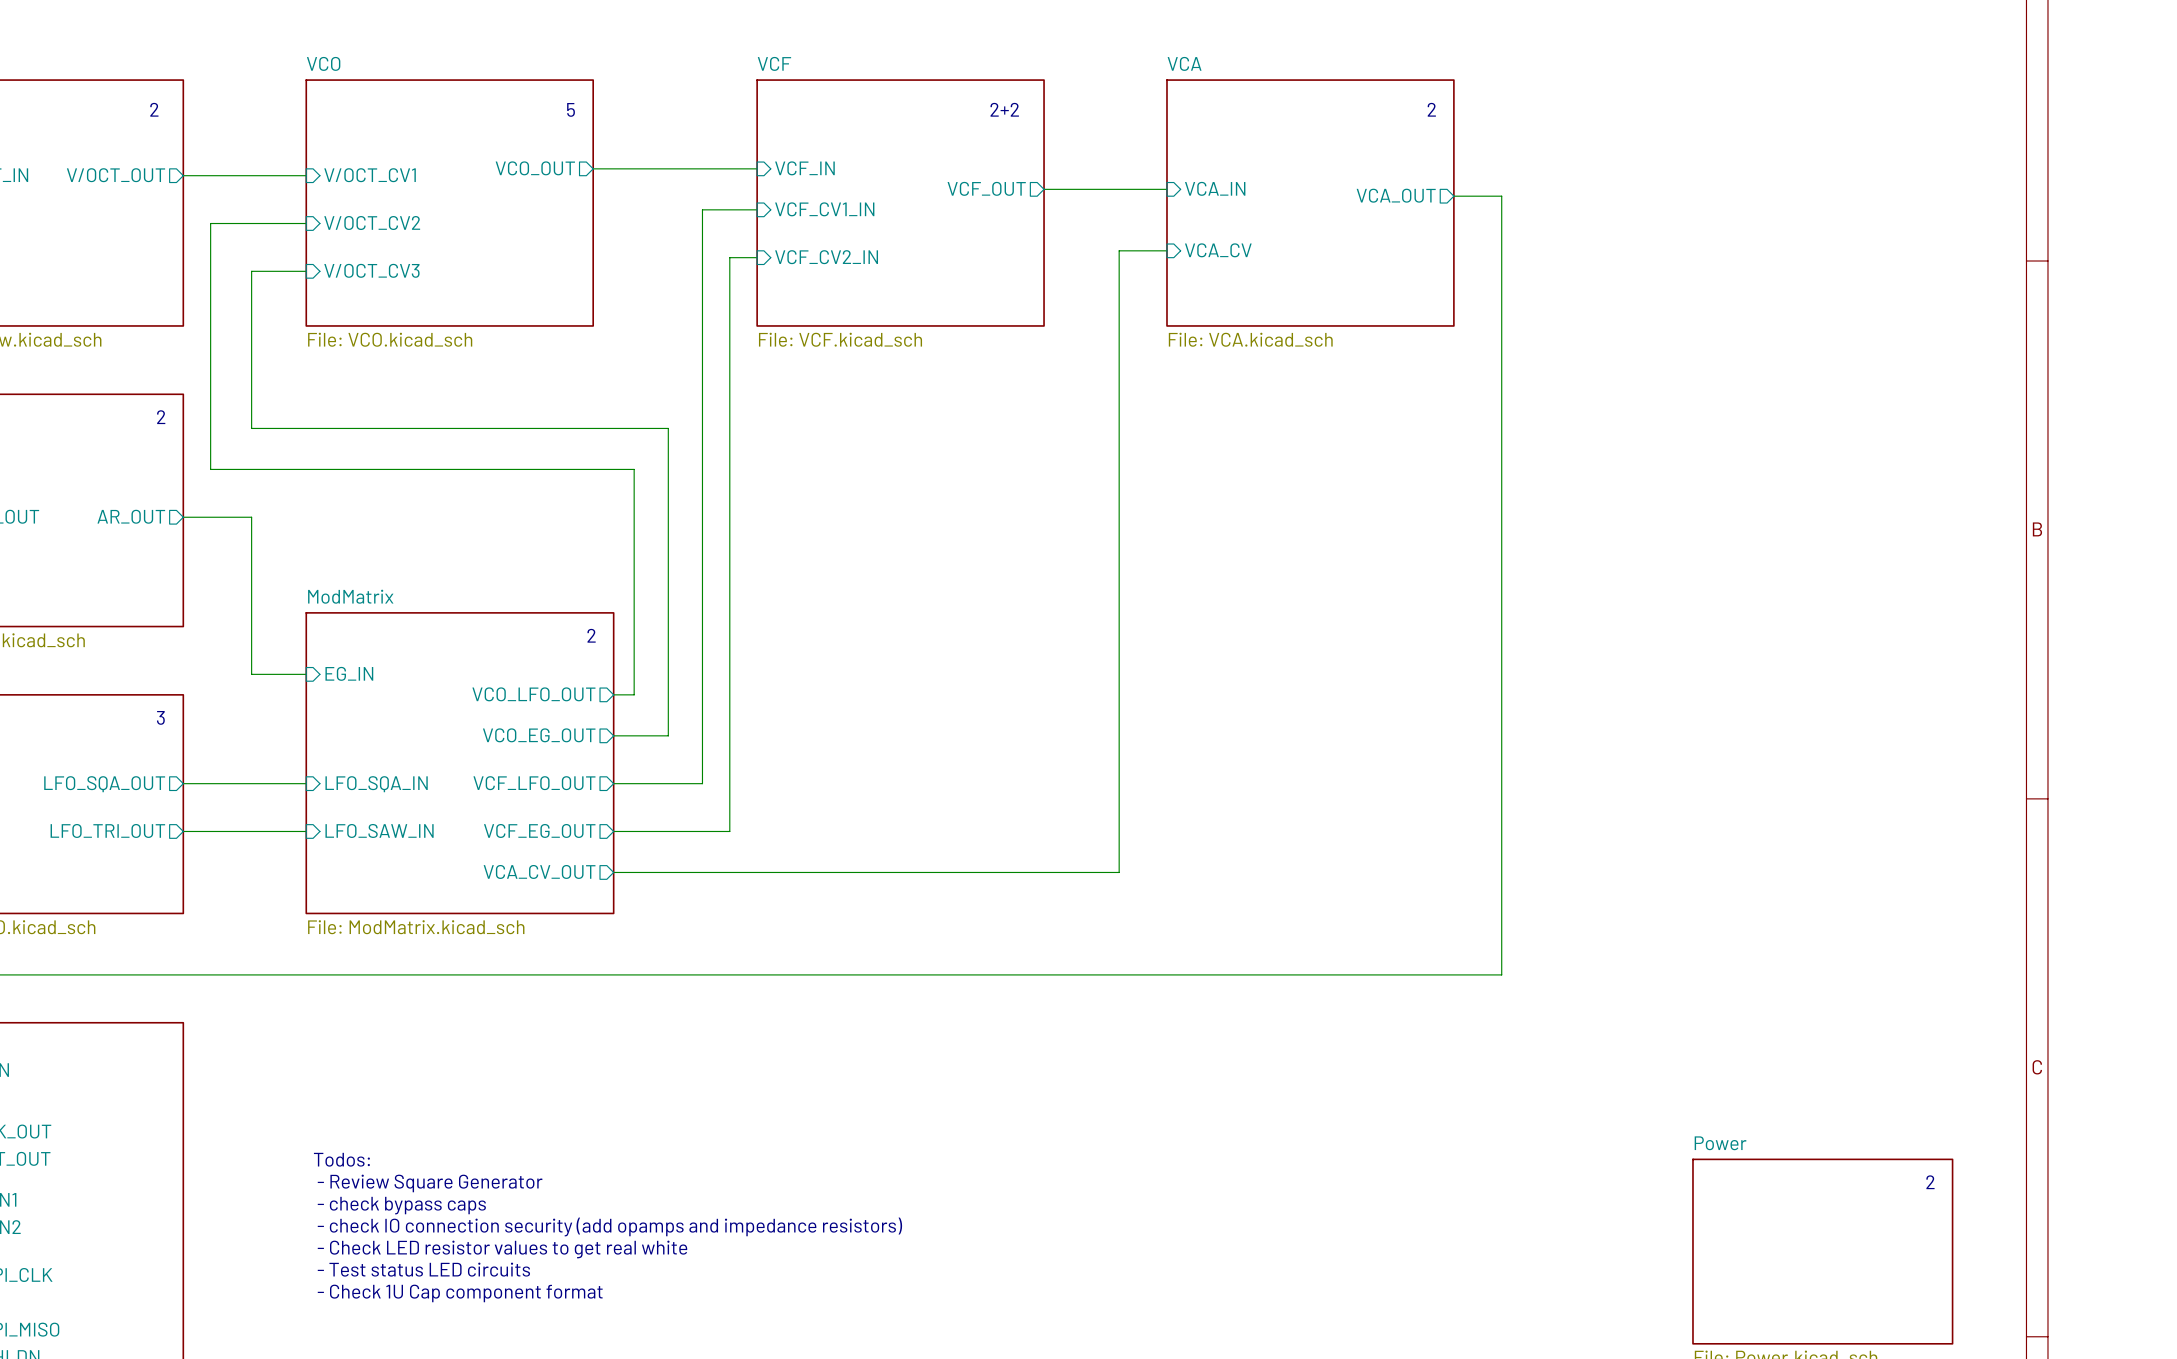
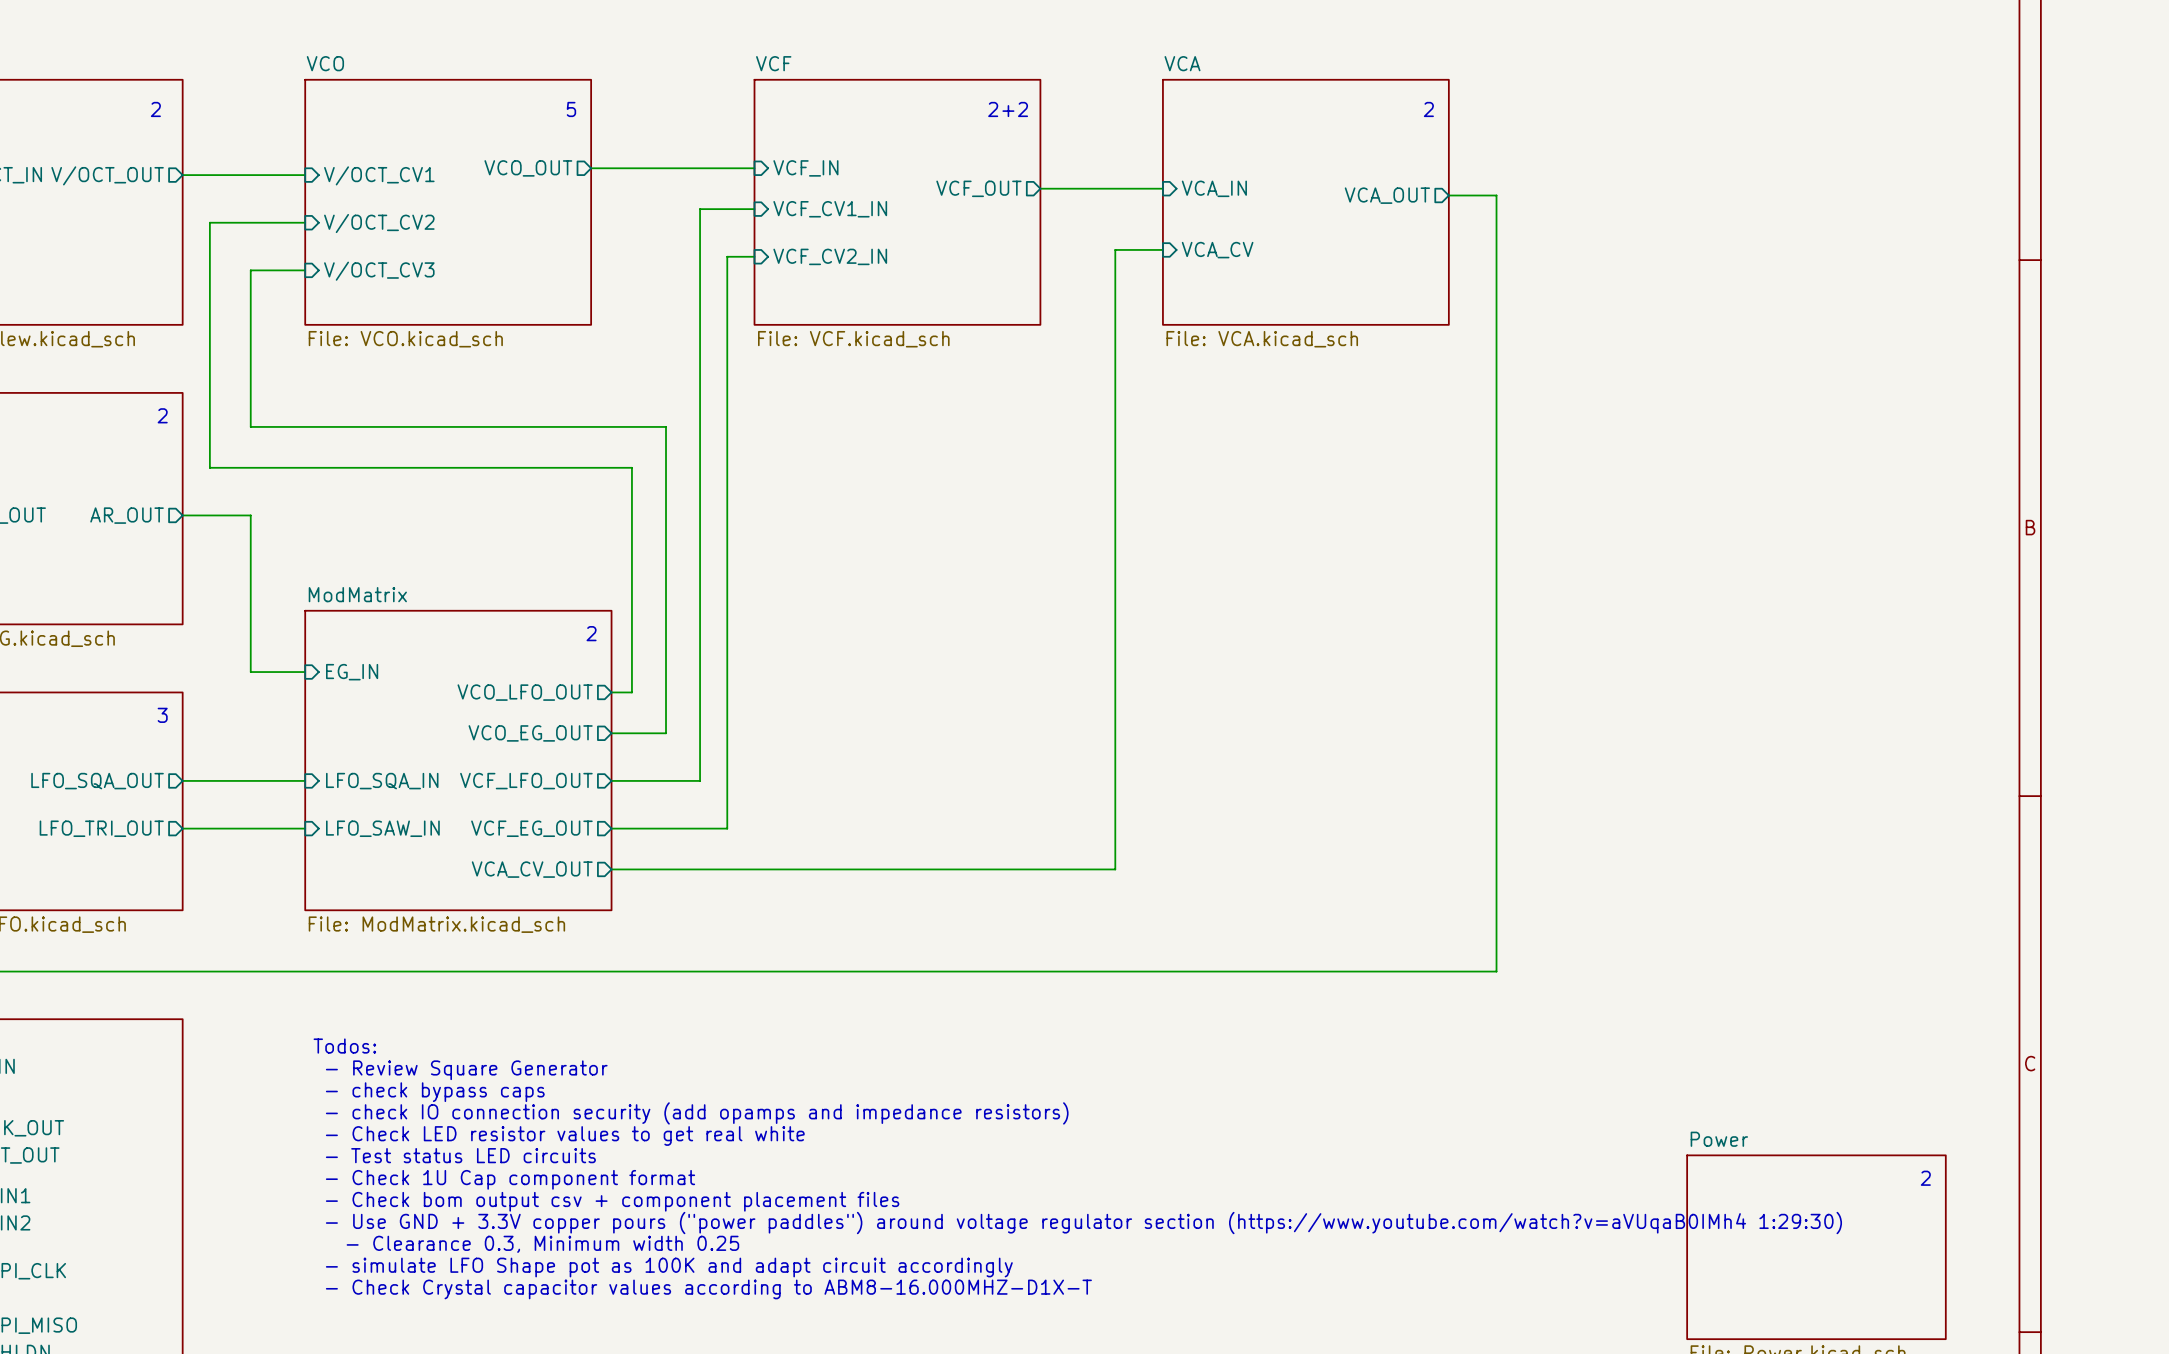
text: none -> Todos: (344, 1046)
text: none -> - Review Square Generator (466, 1070)
text: none -> - check bypass caps (435, 1092)
text: none -> - check IO connection security (add opamps and impedance resistors) (697, 1113)
text: none -> - Check LED resistor values to get real white (565, 1135)
text: Todos: (341, 1159) -> - Test status LED circuits (460, 1155)
text: - Review Square Generator (430, 1183) -> - Check 1U Cap component format (510, 1179)
text: - check bypass caps (401, 1205) -> - Check bom output csv + component placement files (612, 1201)
text: - check IO connection security (add opamps and impedance resistors) (609, 1226) -> - Use GND + 3.3V copper pours ("power paddles") around voltage regulator section (https://www.youtube.com/watch?v=aVUqaB0IMh4 1:29:30) (1083, 1223)
text: - Check LED resistor values to get real white (502, 1249) -> - Clearance 0.3, Minimum width 0.25 (542, 1244)
text: - Test status LED circuits (423, 1269) -> - simulate LFO Shape pot as 100K and adapt circuit accordingly (669, 1267)
text: - Check 1U Cap component format (460, 1293) -> - Check Crystal capacitor values according to ABM8-16.000MHZ-D1X-T (708, 1289)

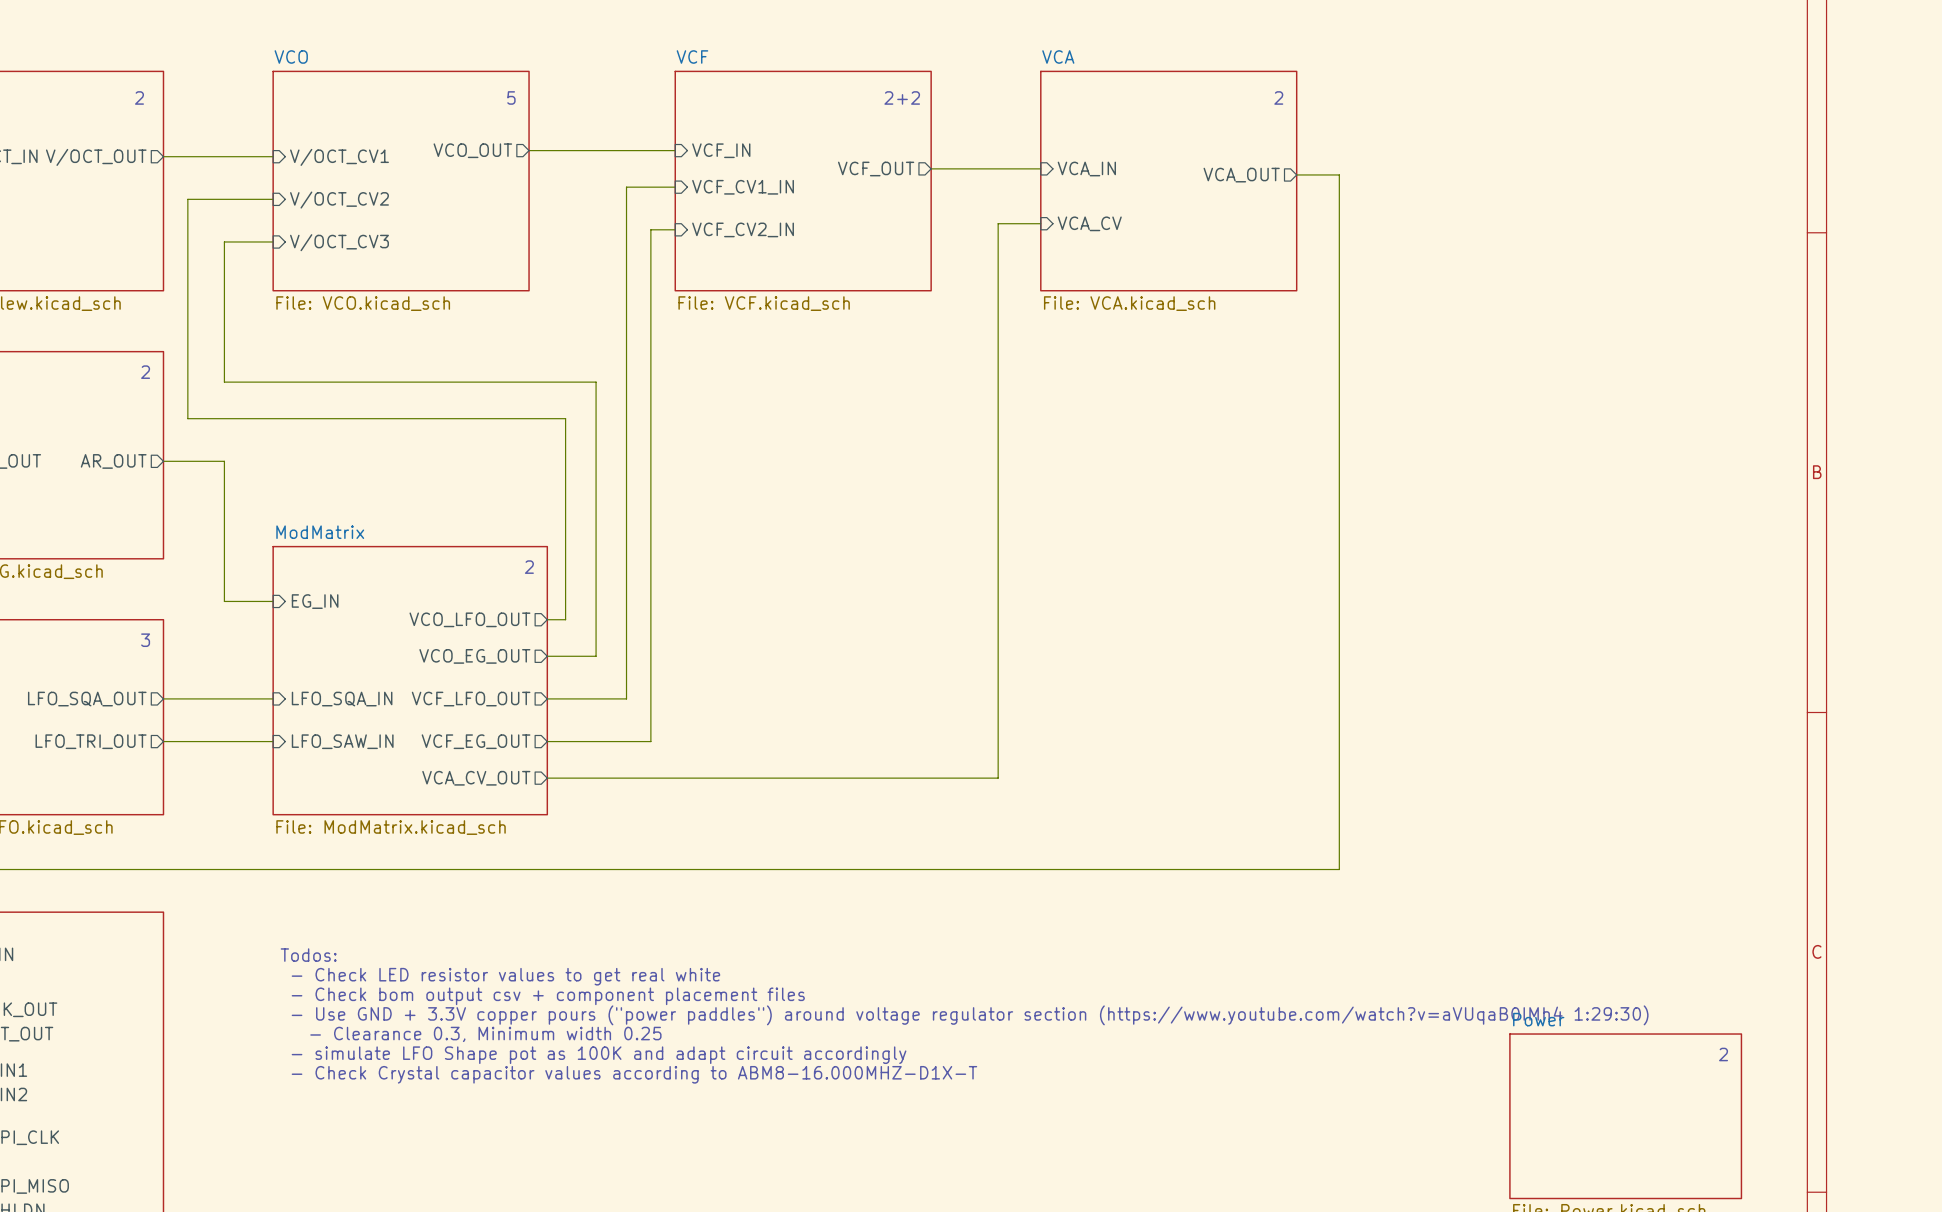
text: Todos: (344, 1046) -> none
text: - Review Square Generator (466, 1070) -> Todos: (308, 955)
text: - check bypass caps (435, 1092) -> - Check LED resistor values to get real white (505, 976)
text: - check IO connection security (add opamps and impedance resistors) (697, 1113) -> - Check bom output csv + component placement files (548, 996)
text: - Check LED resistor values to get real white (565, 1135) -> - Use GND + 3.3V copper pours ("power paddles") around voltage regulator section (https://www.youtube.com/watch?v=aVUqaB0IMh4 1:29:30) (970, 1015)
text: - Test status LED circuits (460, 1155) -> - Clearance 0.3, Minimum width 0.25 (485, 1034)
text: - Check 1U Cap component format (510, 1179) -> - simulate LFO Shape pot as 100K and adapt circuit accordingly (599, 1055)
text: - Check bom output csv + component placement files (612, 1201) -> - Check Crystal capacitor values according to ABM8-16.000MHZ-D1X-T (634, 1074)
text: - Use GND + 3.3V copper pours ("power paddles") around voltage regulator section (https://www.youtube.com/watch?v=aVUqaB0IMh4 1:29:30) (1083, 1223) -> none
text: - Clearance 0.3, Minimum width 0.25 (542, 1244) -> none
text: - simulate LFO Shape pot as 100K and adapt circuit accordingly (669, 1267) -> none
text: - Check Crystal capacitor values according to ABM8-16.000MHZ-D1X-T (708, 1289) -> none

